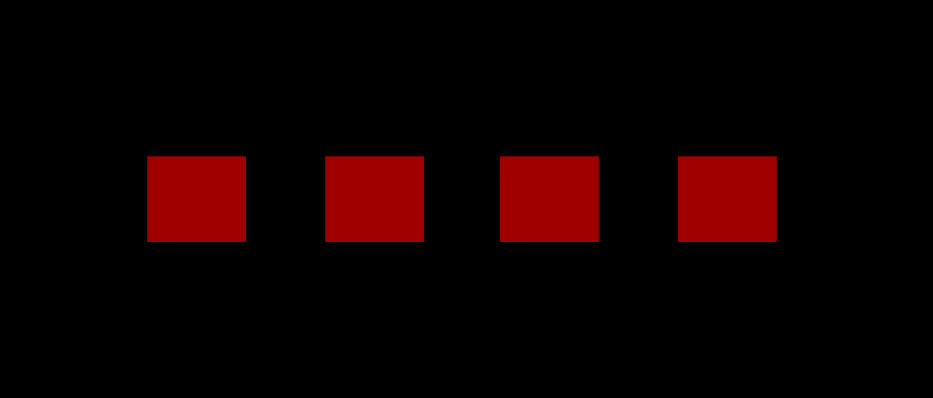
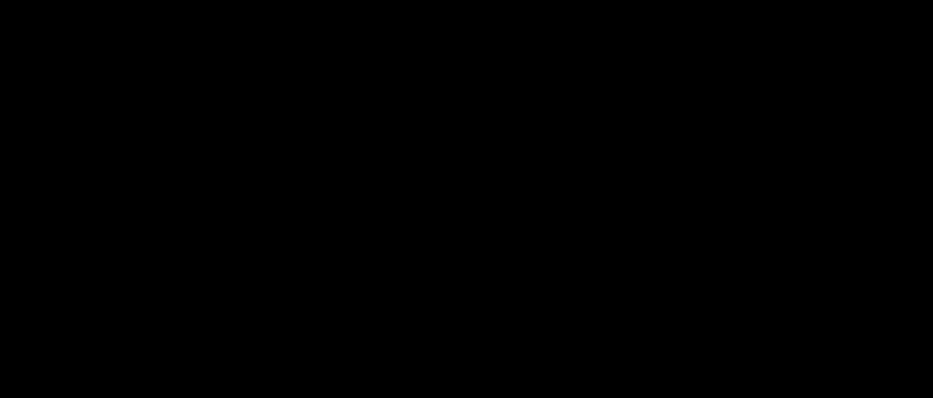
part: (285, 199) -> none
part: (638, 199) -> none

